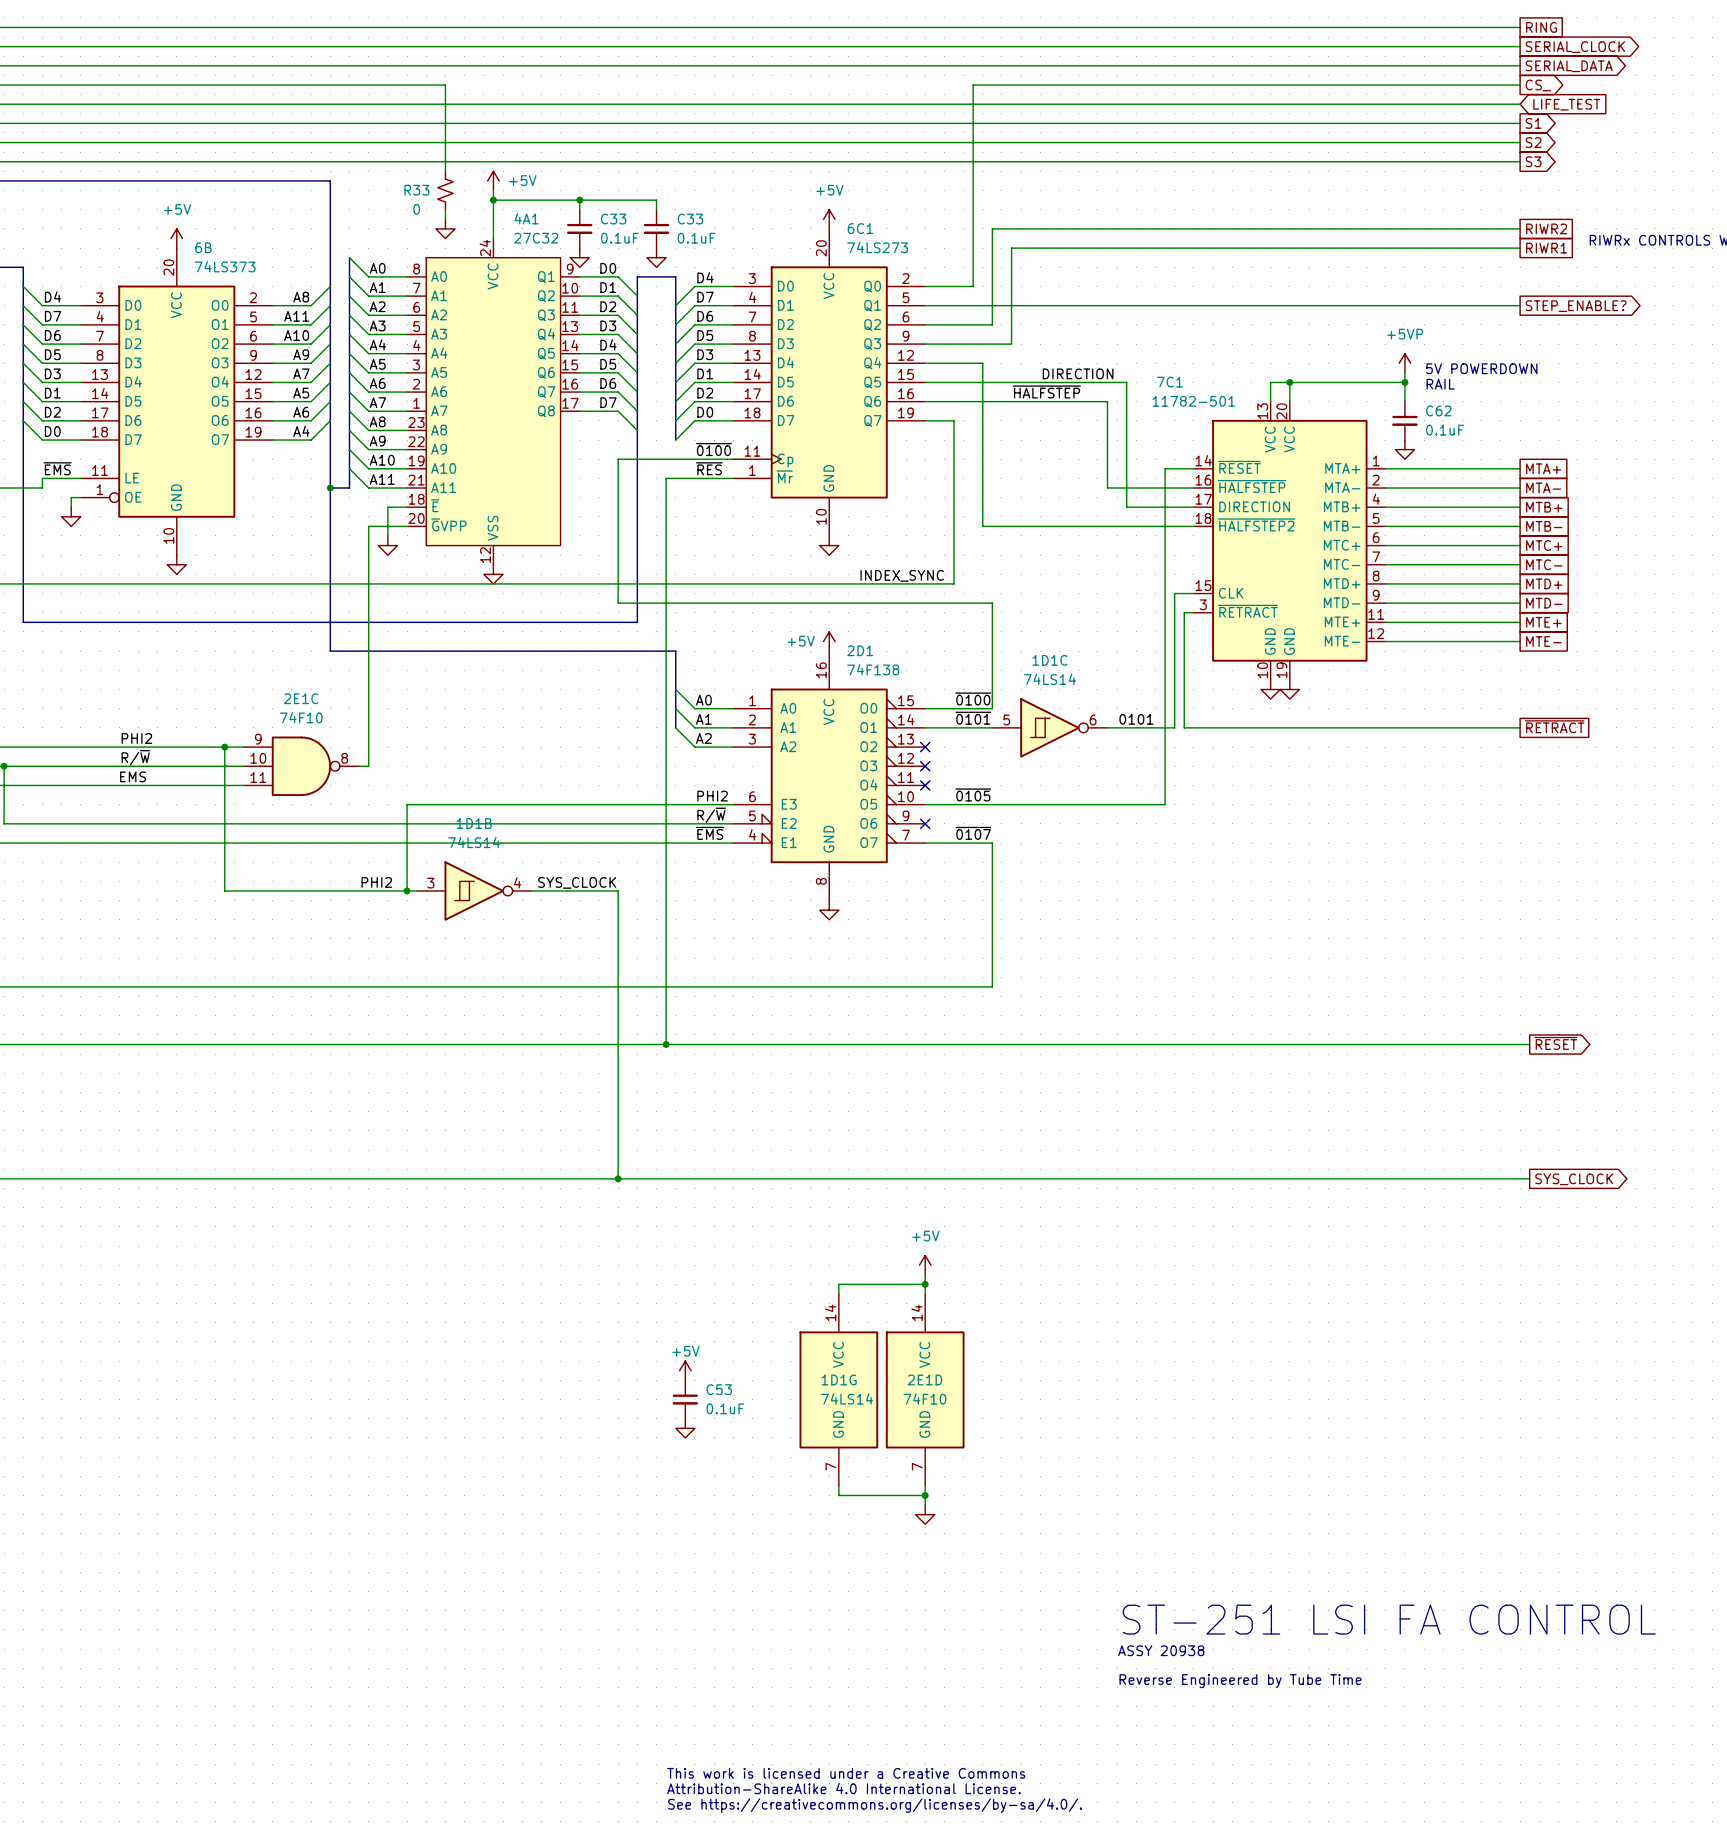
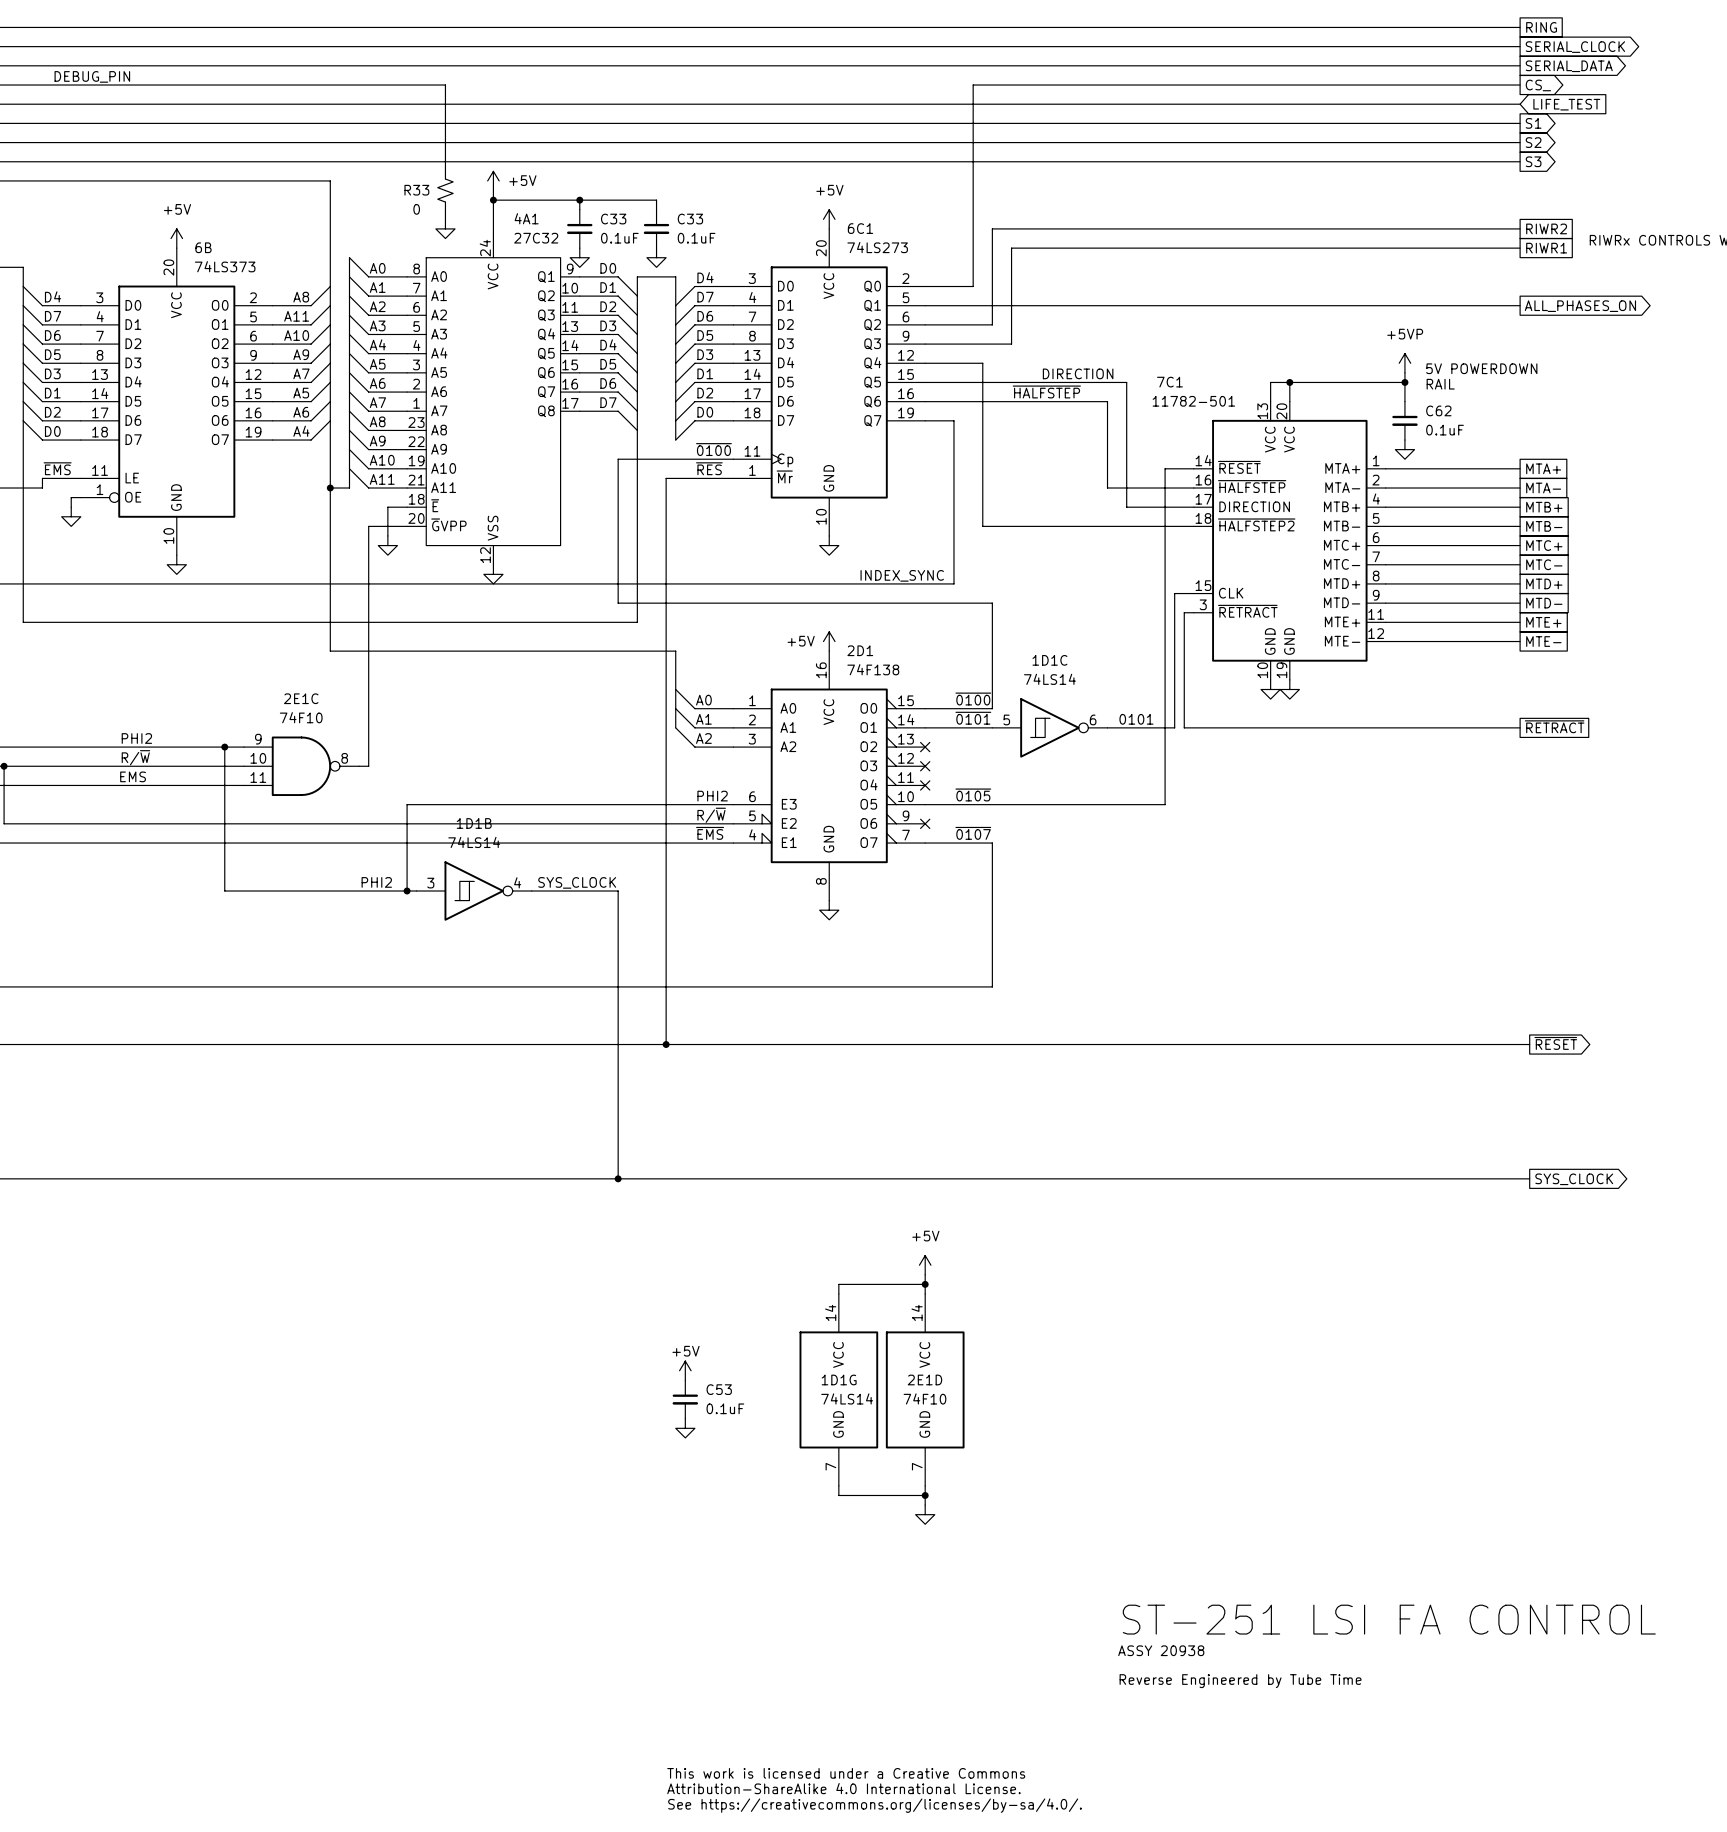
label: none -> DEBUG_PIN (92, 76)
global label: STEP_ENABLE? (1576, 306) -> ALL_PHASES_ON (1580, 306)

